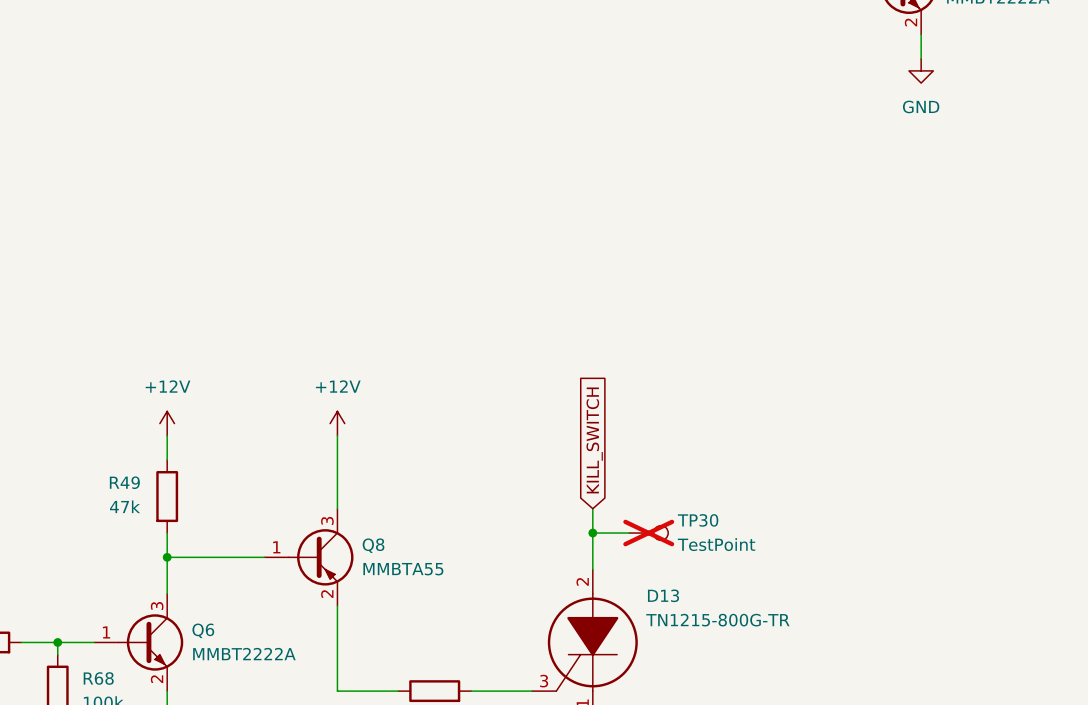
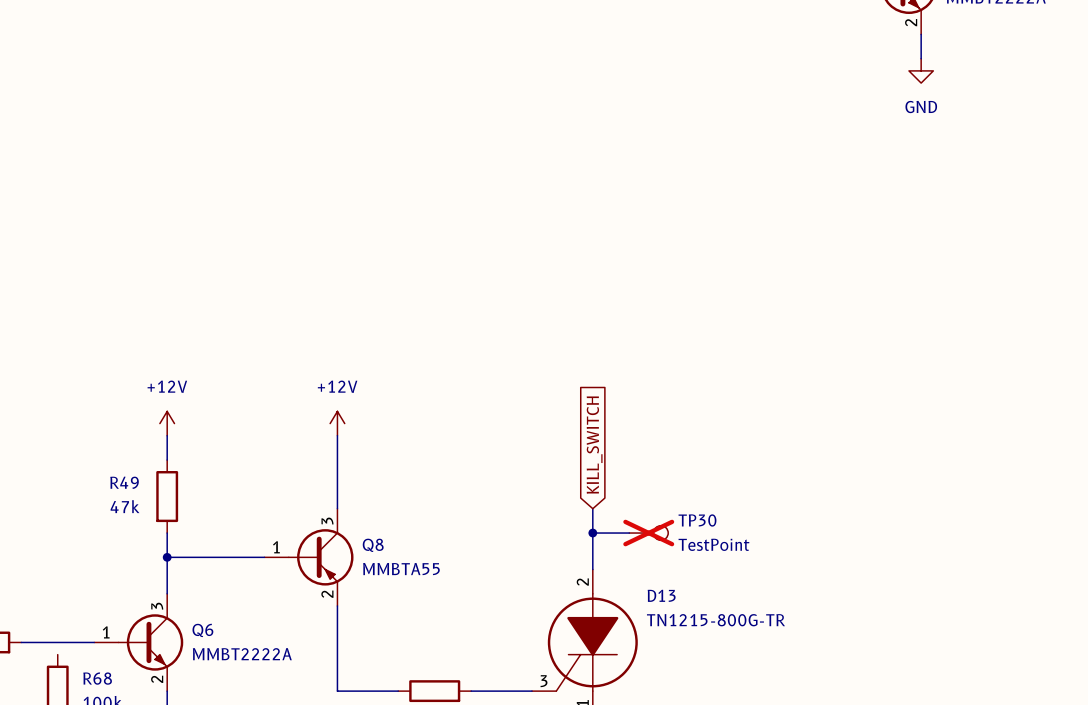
wire: (57, 642) (57, 654) -> none
junction: (57, 642) -> none

